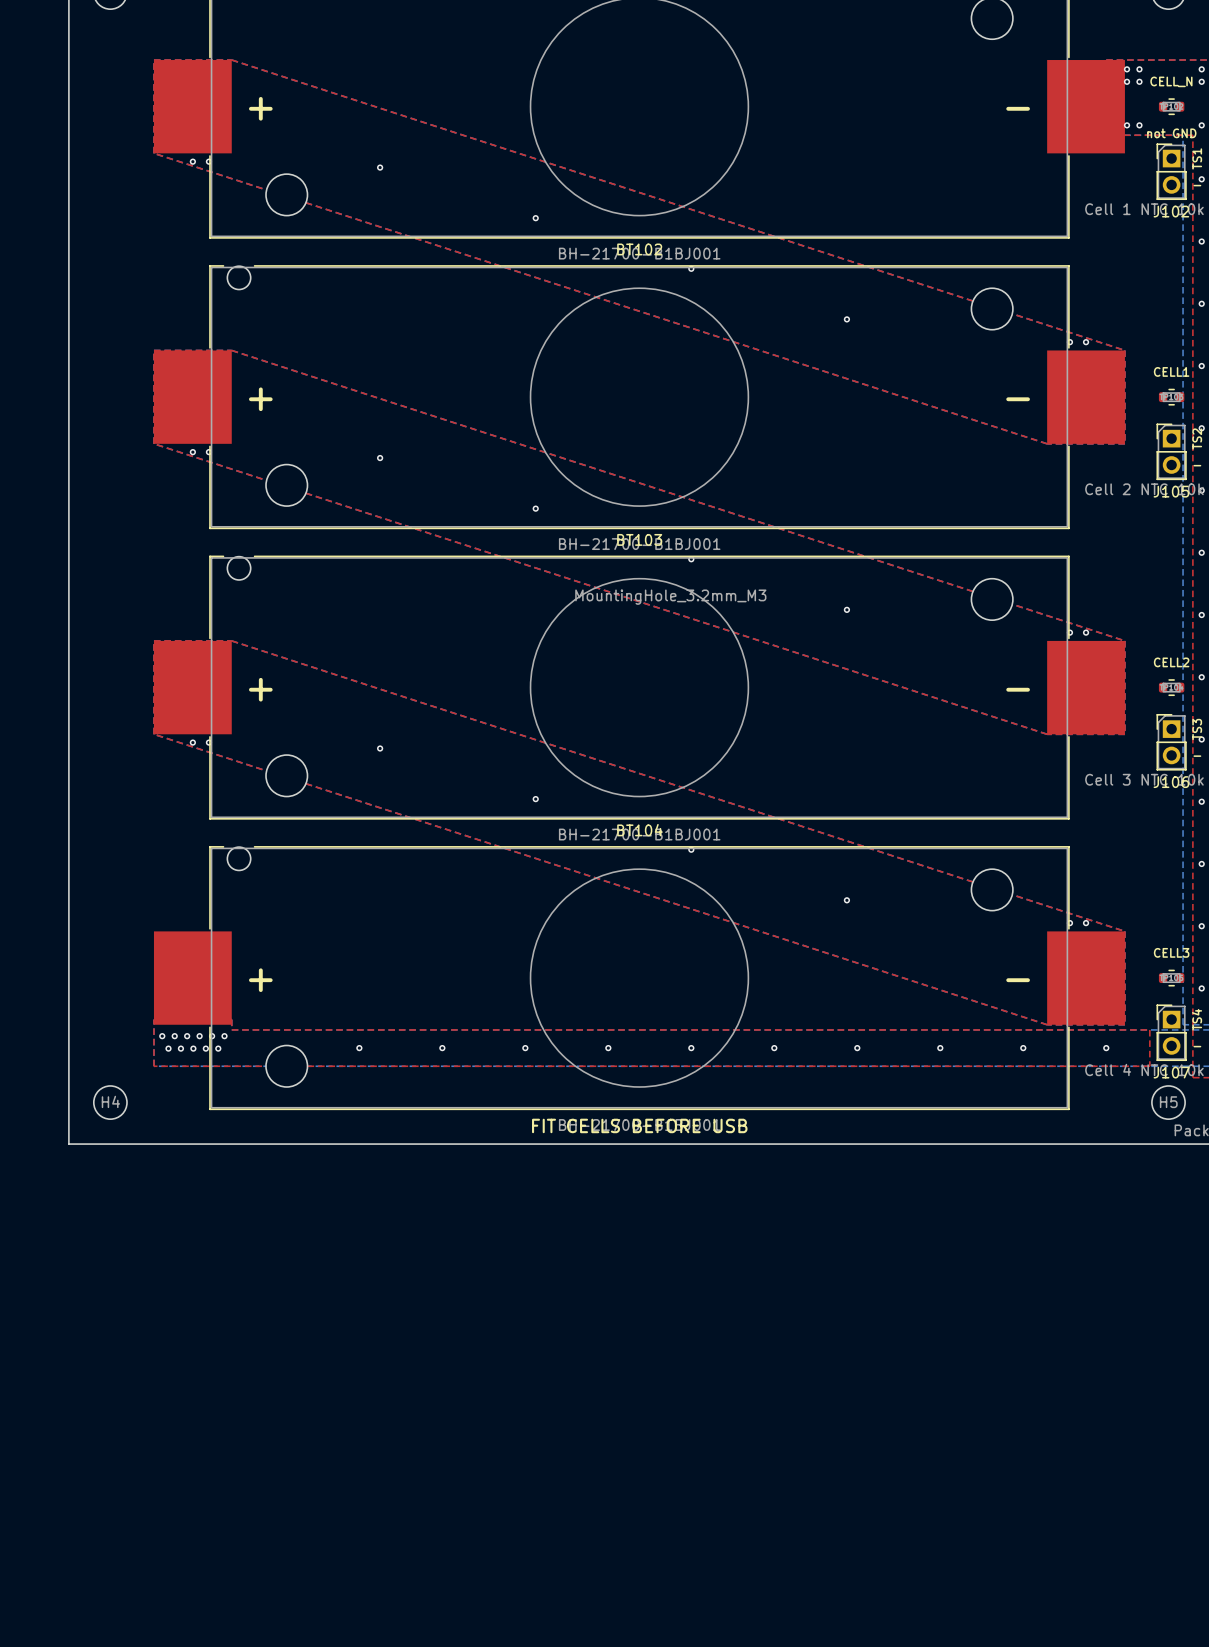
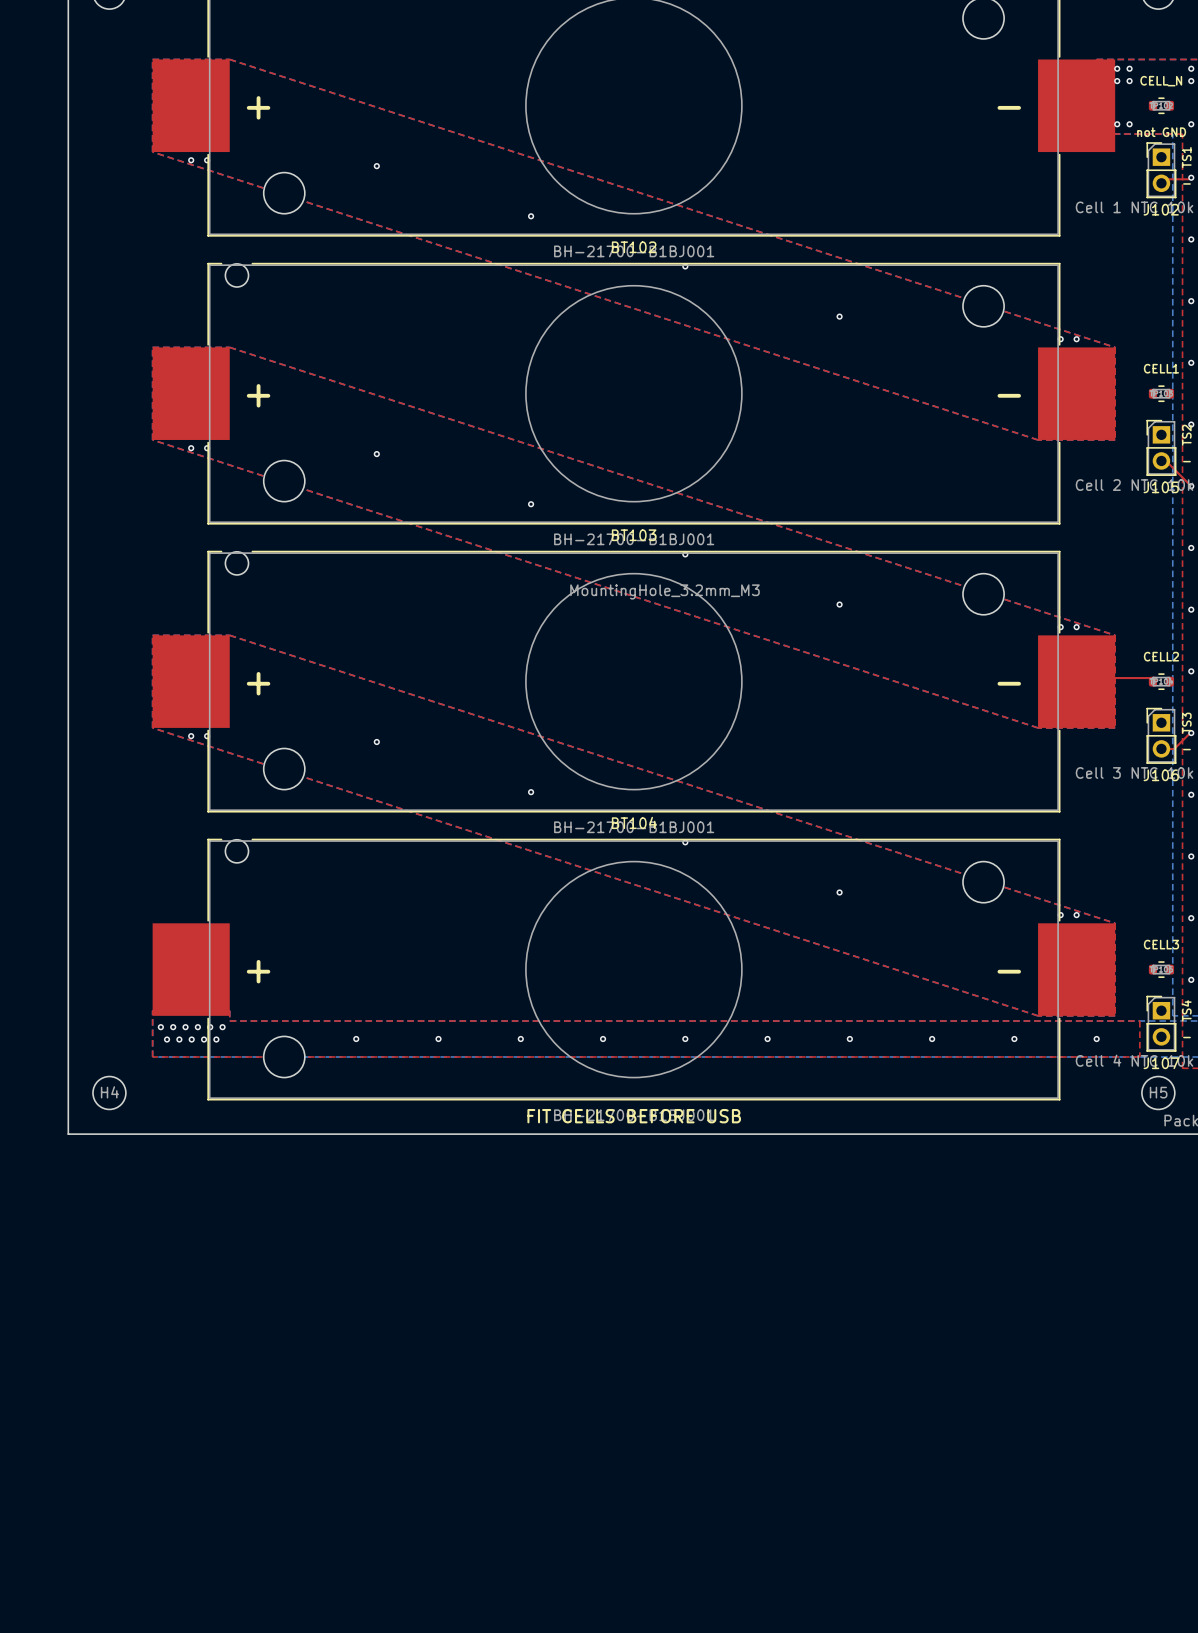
top track: none -> (1169, 179) (1188, 179)
top track: none -> (1169, 464) (1188, 483)
top track: none -> (1114, 678) (1149, 678)
top track: none -> (1188, 734) (1174, 749) (1169, 749)

